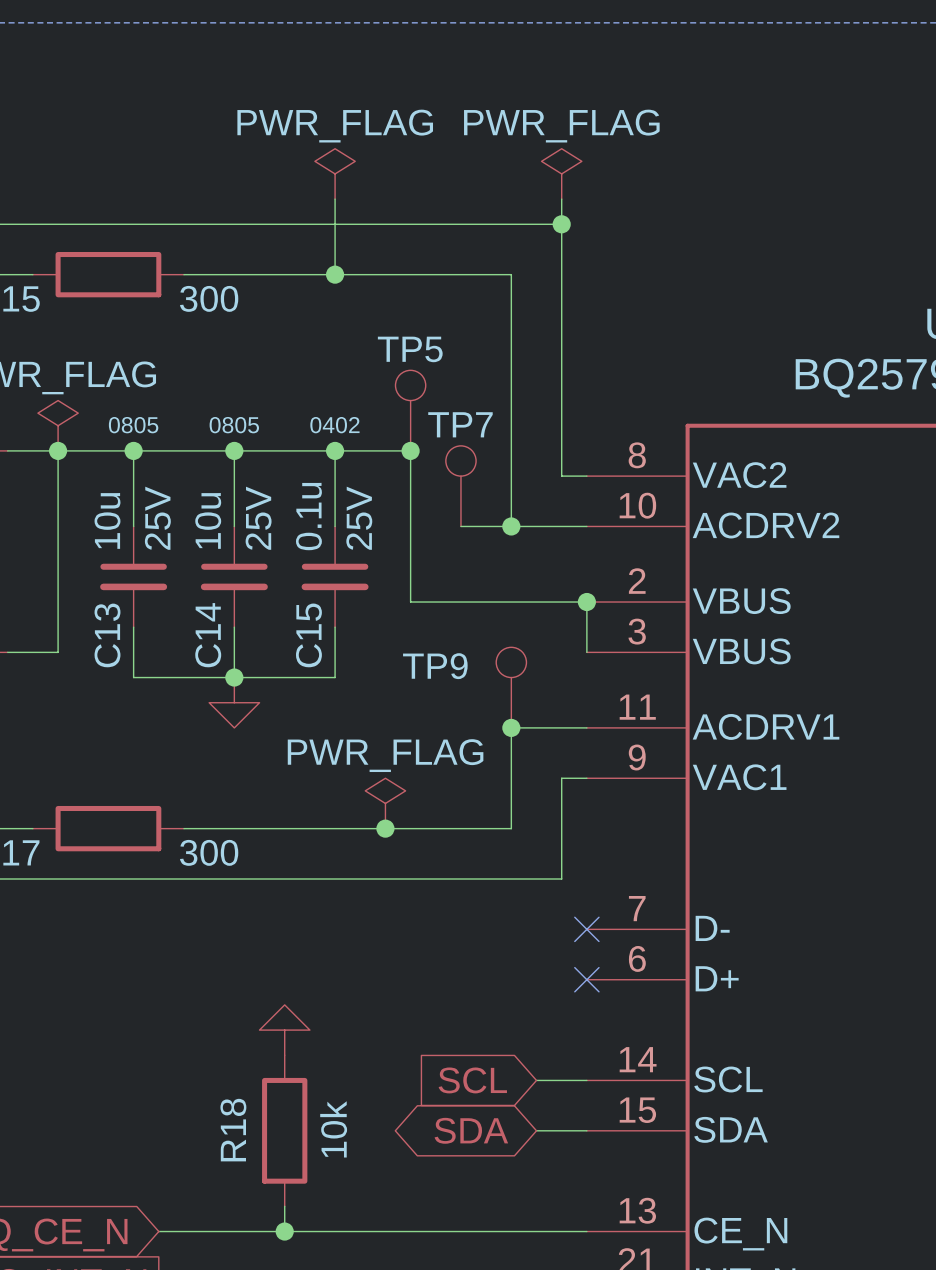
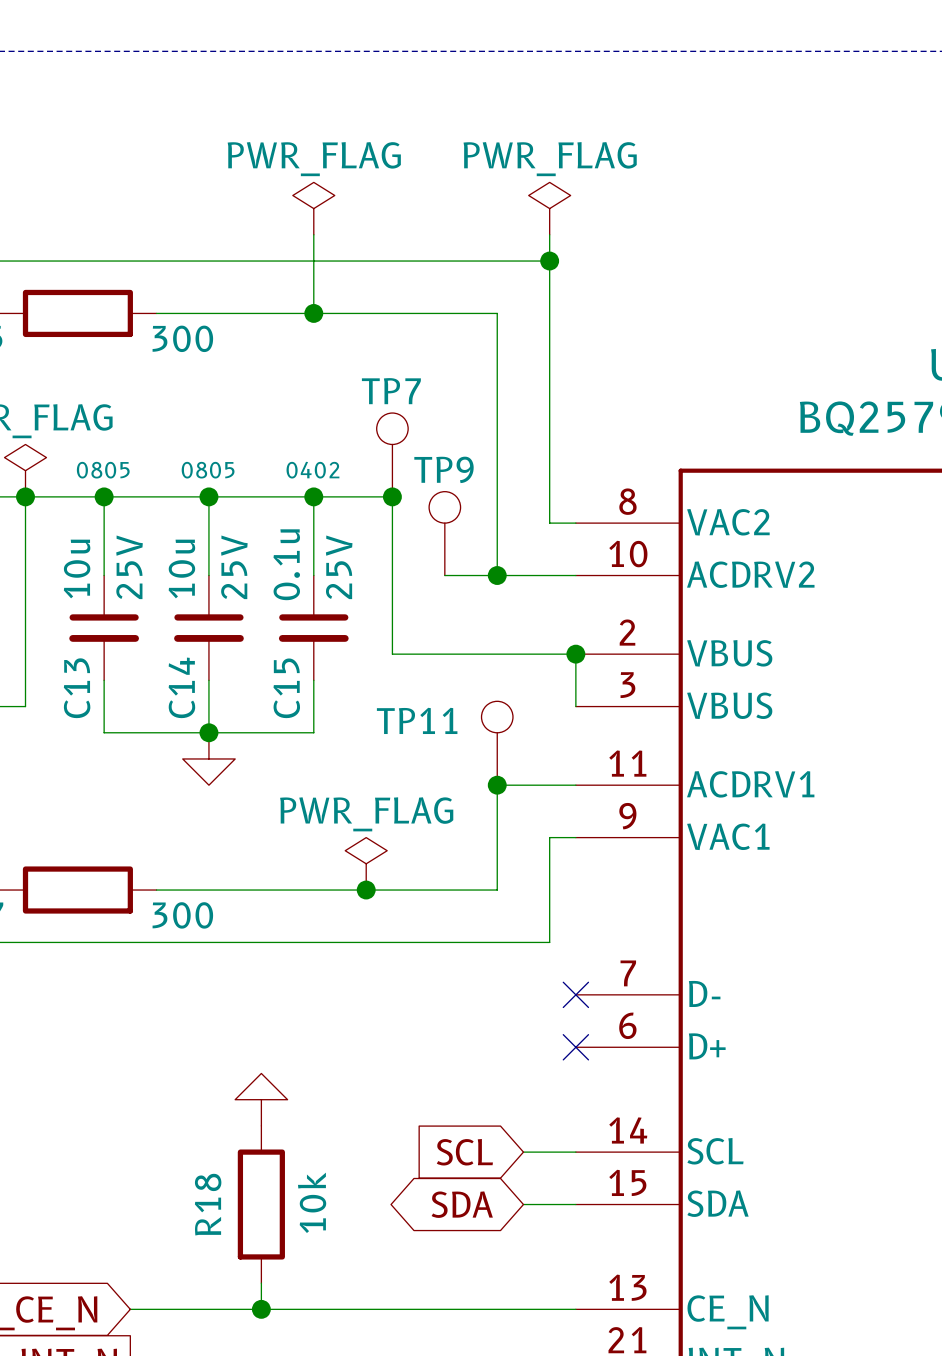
TP5 name: TP5 (410, 349) -> TP7 (391, 391)
TP7 name: TP7 (460, 424) -> TP9 (443, 469)
TP9 name: TP9 (435, 666) -> TP11 (417, 720)

